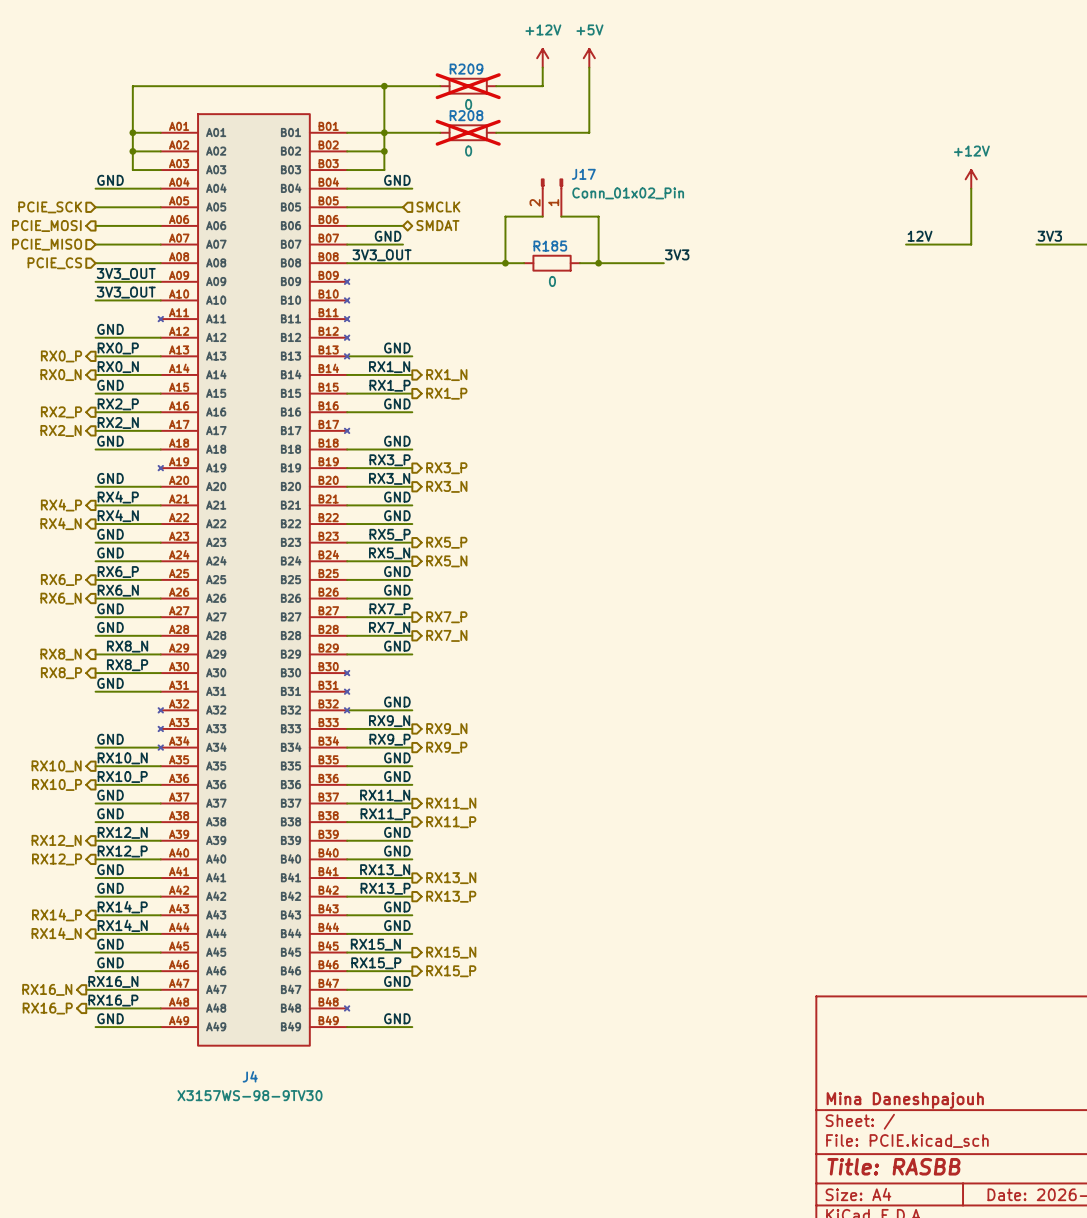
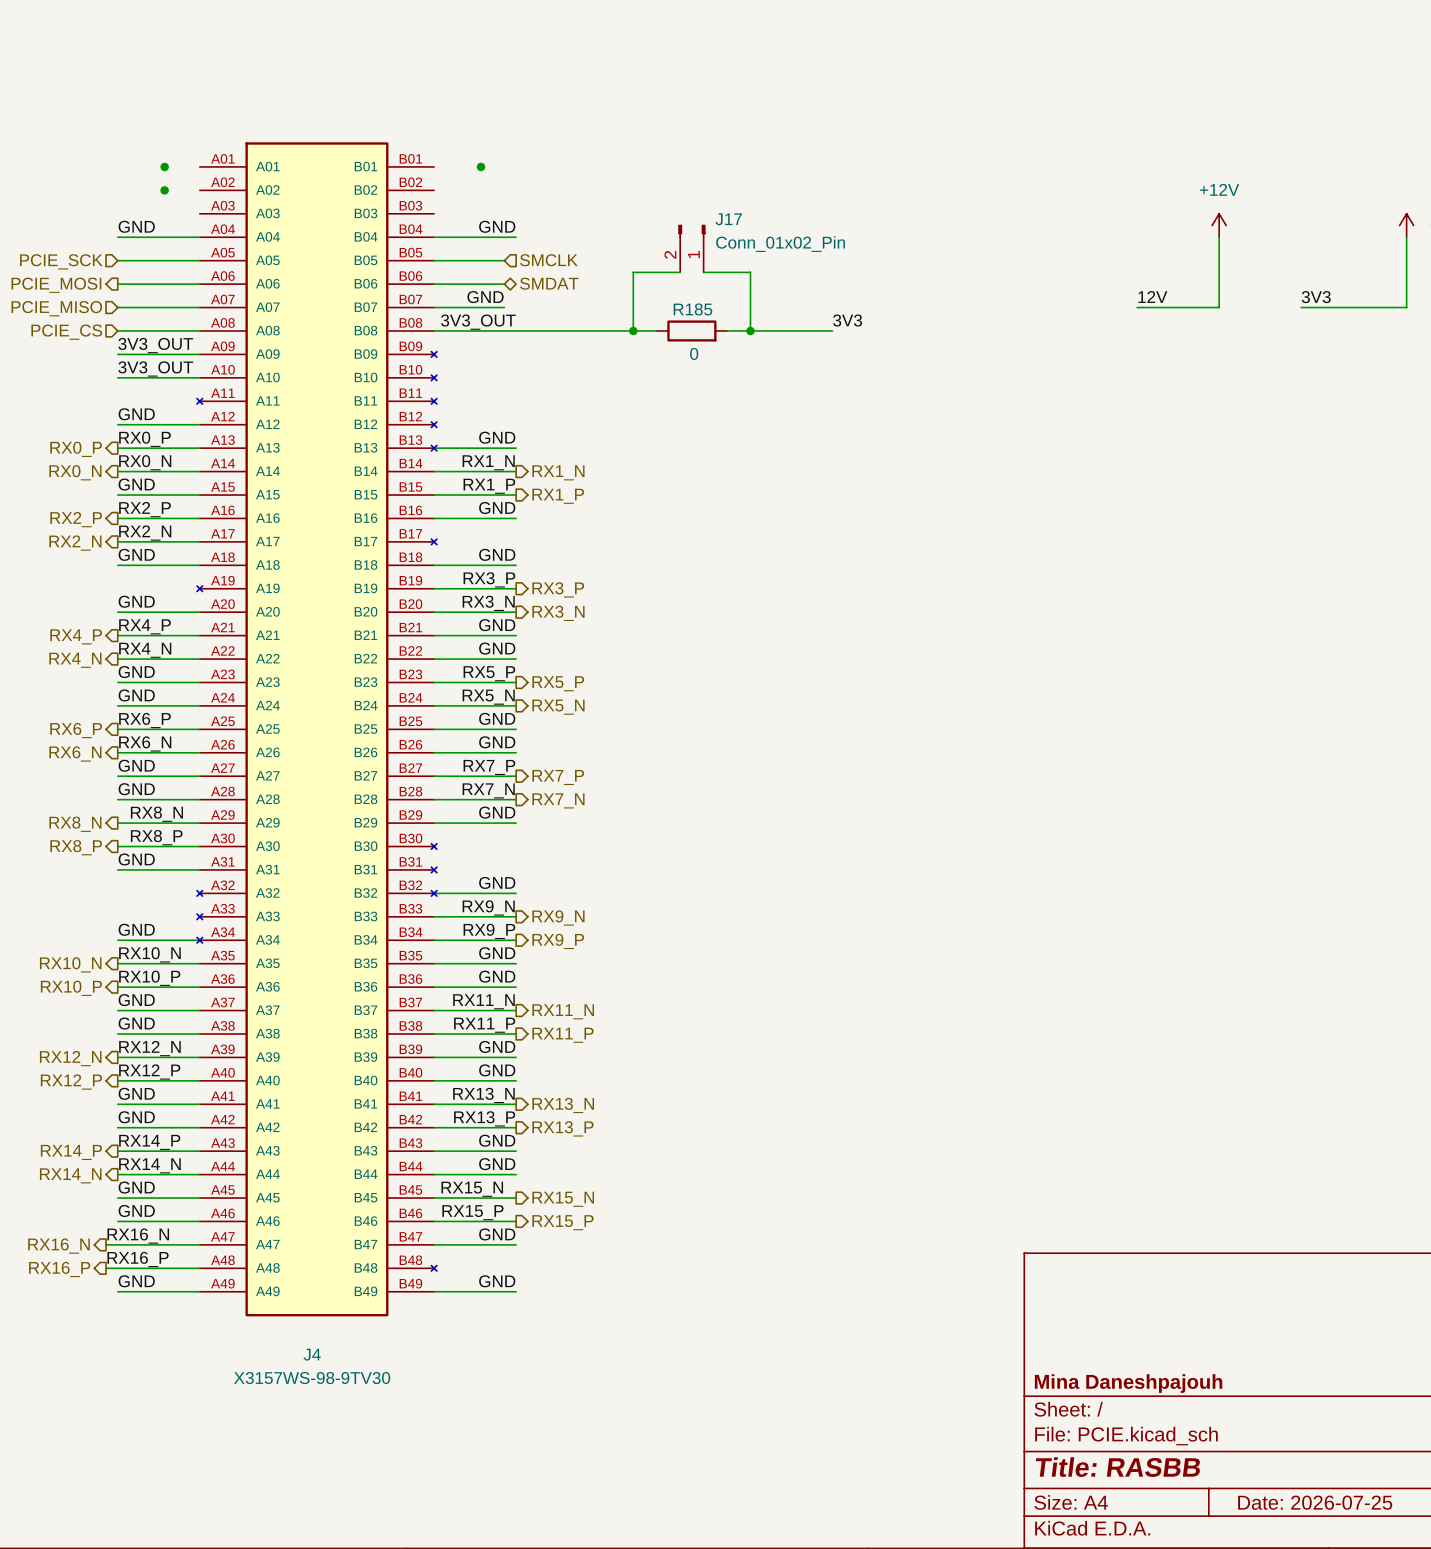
power symbol: +12V (542, 58) -> none
power symbol: +5V (589, 58) -> none
wire: (542, 67) (542, 86) (496, 86) -> none
wire: (589, 67) (589, 132) (496, 132) -> none
wire: (384, 86) (384, 170) (347, 170) -> none
junction: (384, 86) -> none
wire: (440, 86) (132, 86) (132, 170) (160, 170) -> none
R209: 0 (468, 86) -> none
wire: (132, 132) (160, 132) -> none
wire: (347, 132) (440, 132) -> none
R208: 0 (468, 132) -> none
wire: (132, 151) (160, 151) -> none
wire: (347, 151) (384, 151) -> none
junction: (384, 151) -> none

